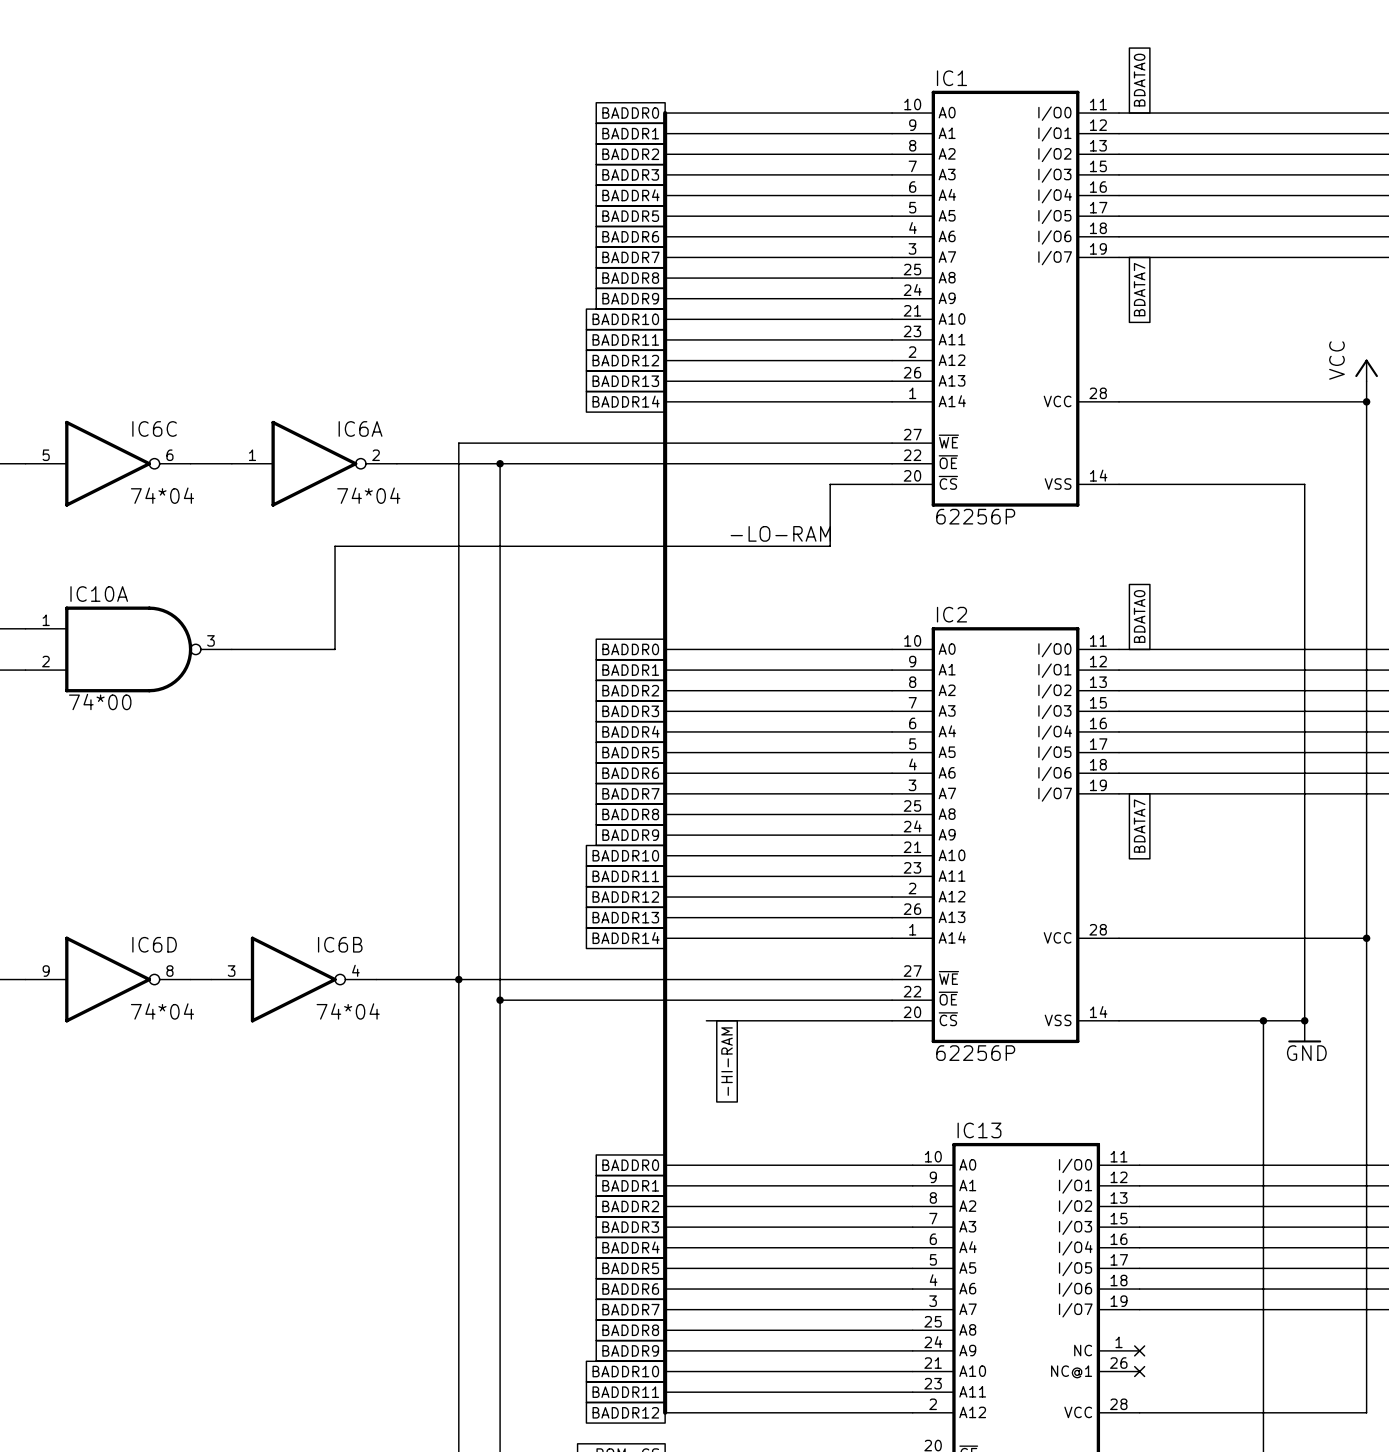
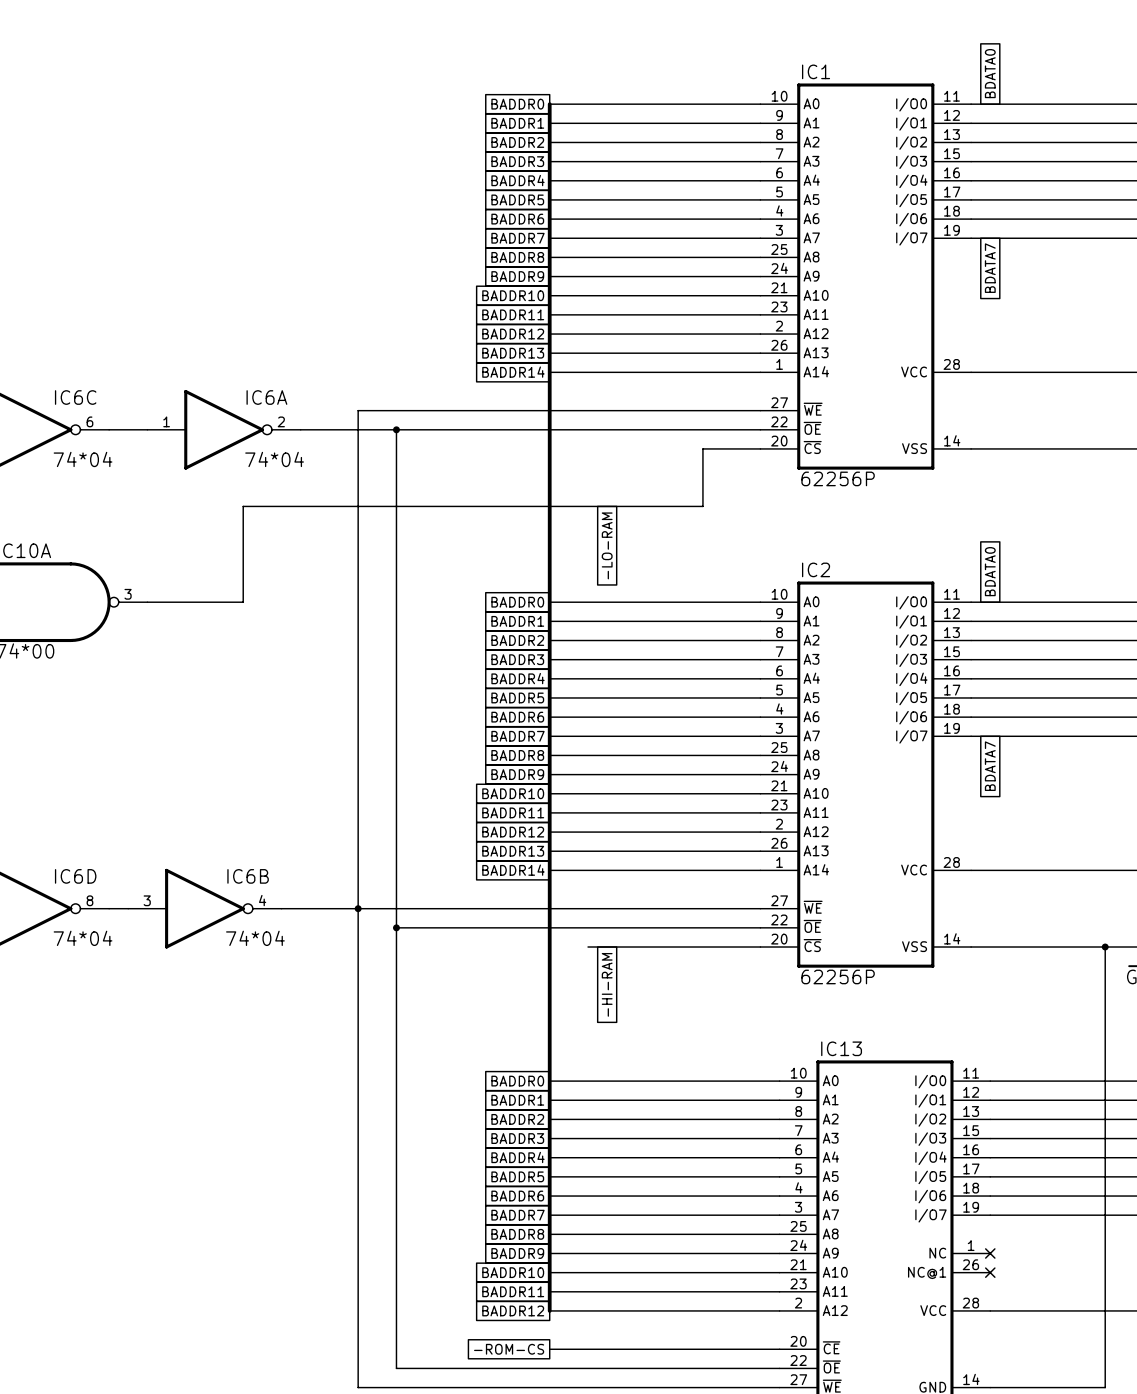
label: -LO-RAM (780, 533) -> none
global label: none -> -LO-RAM (607, 545)

